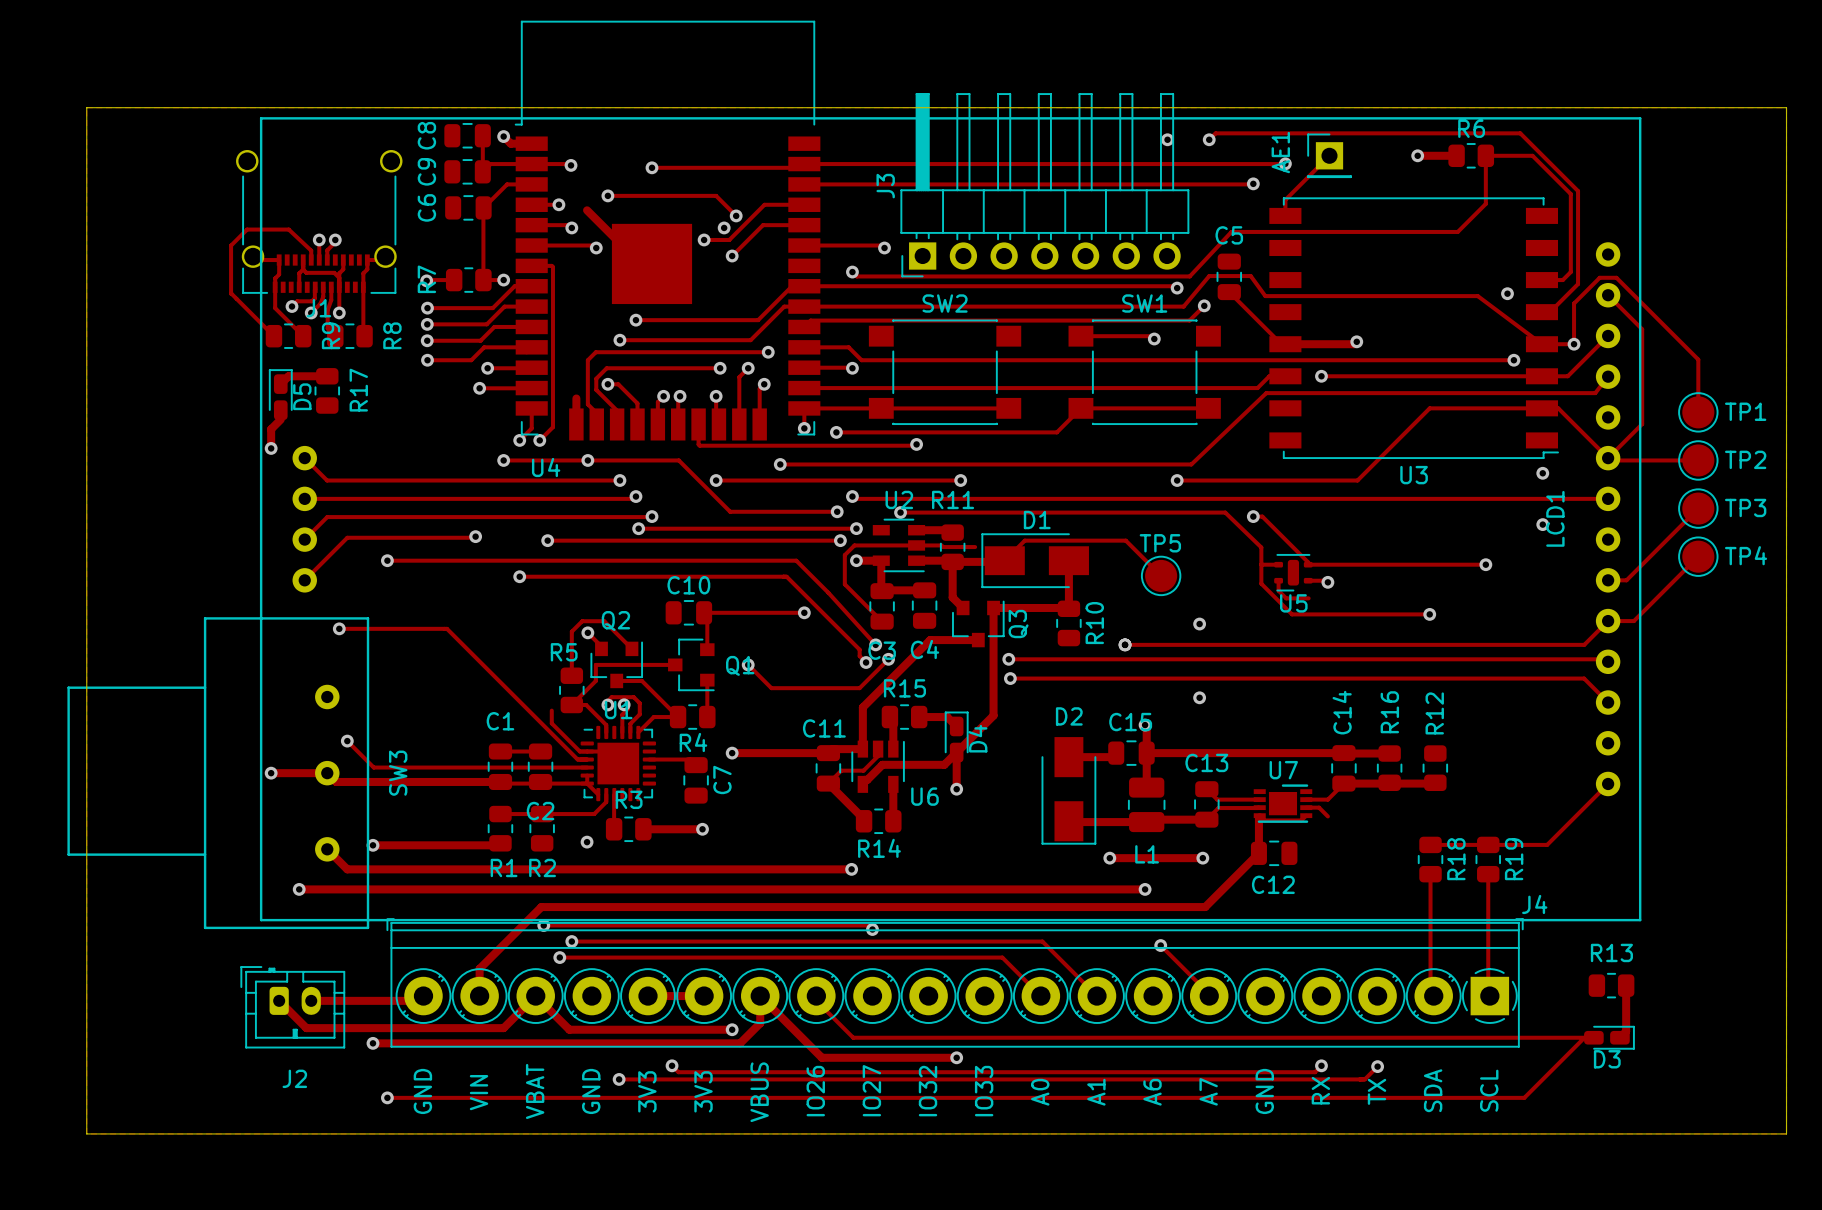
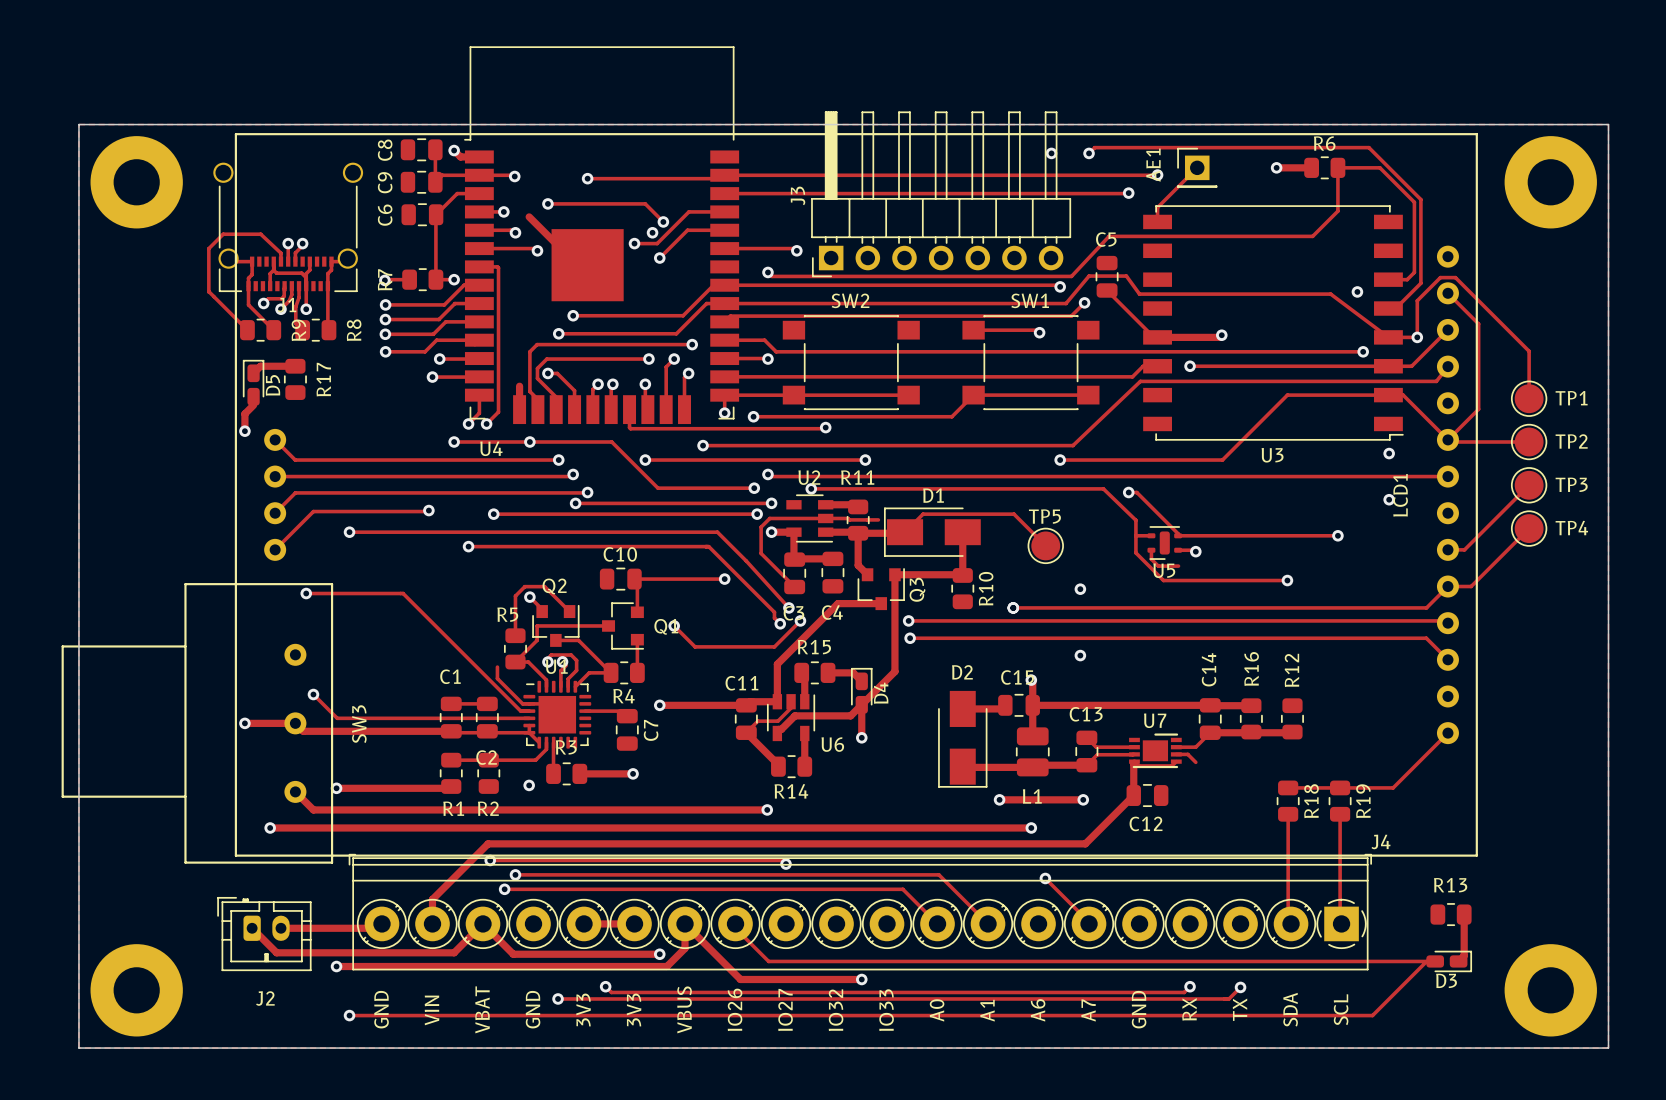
part: none -> (136, 182)
part: none -> (1550, 182)
part: none -> (136, 990)
part: none -> (1550, 990)

